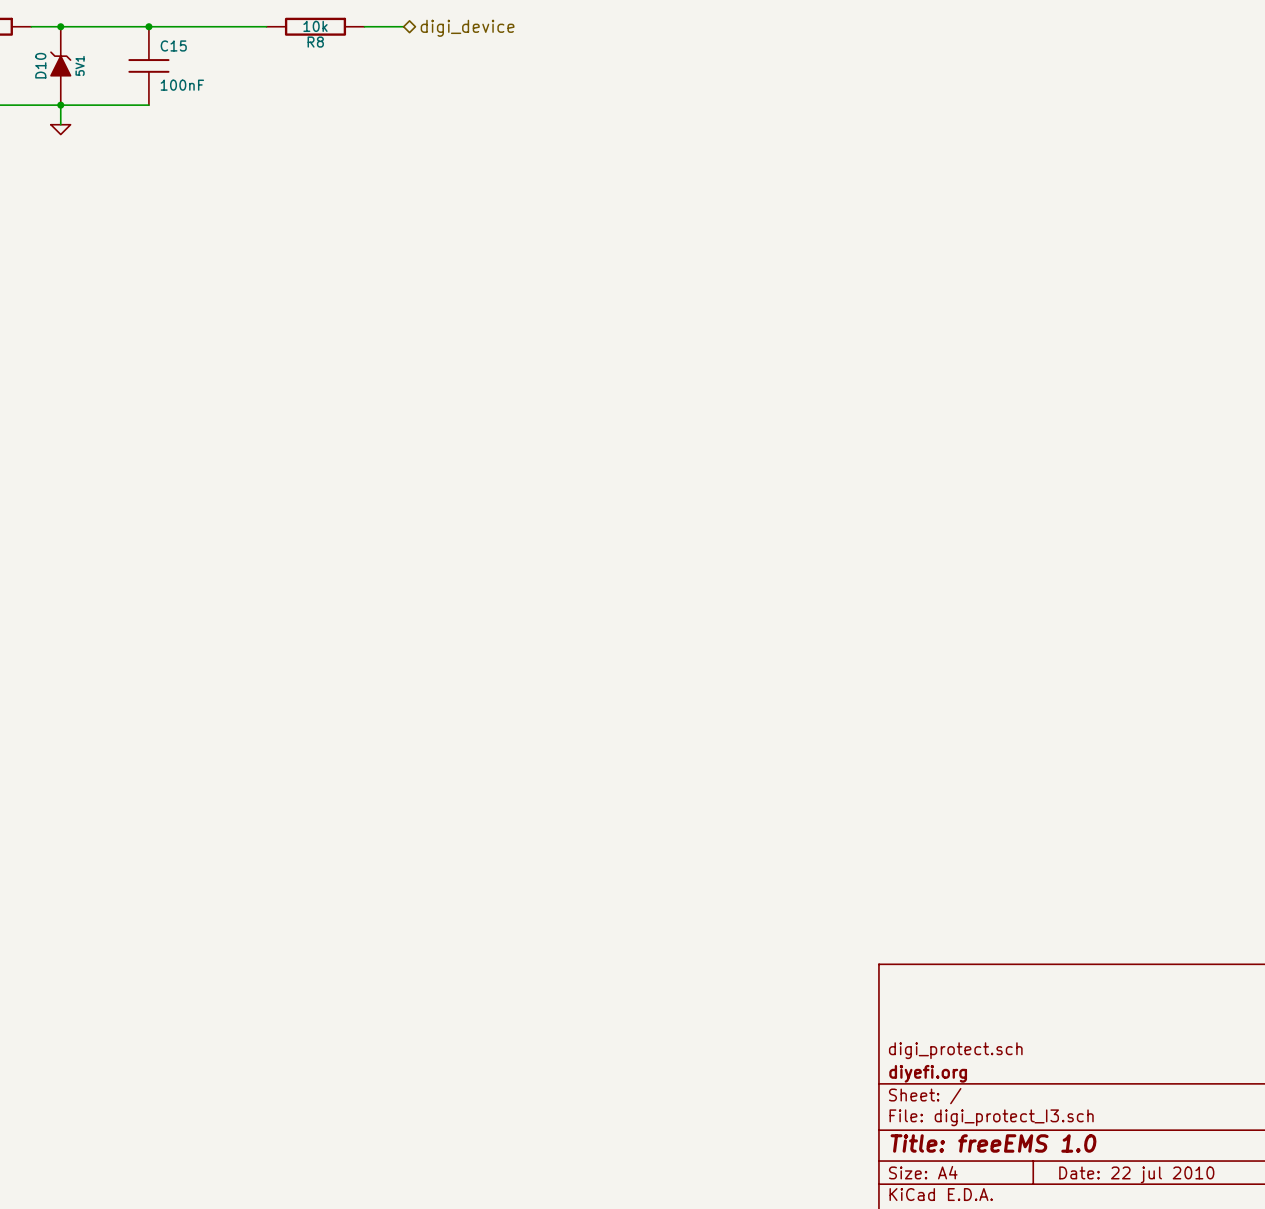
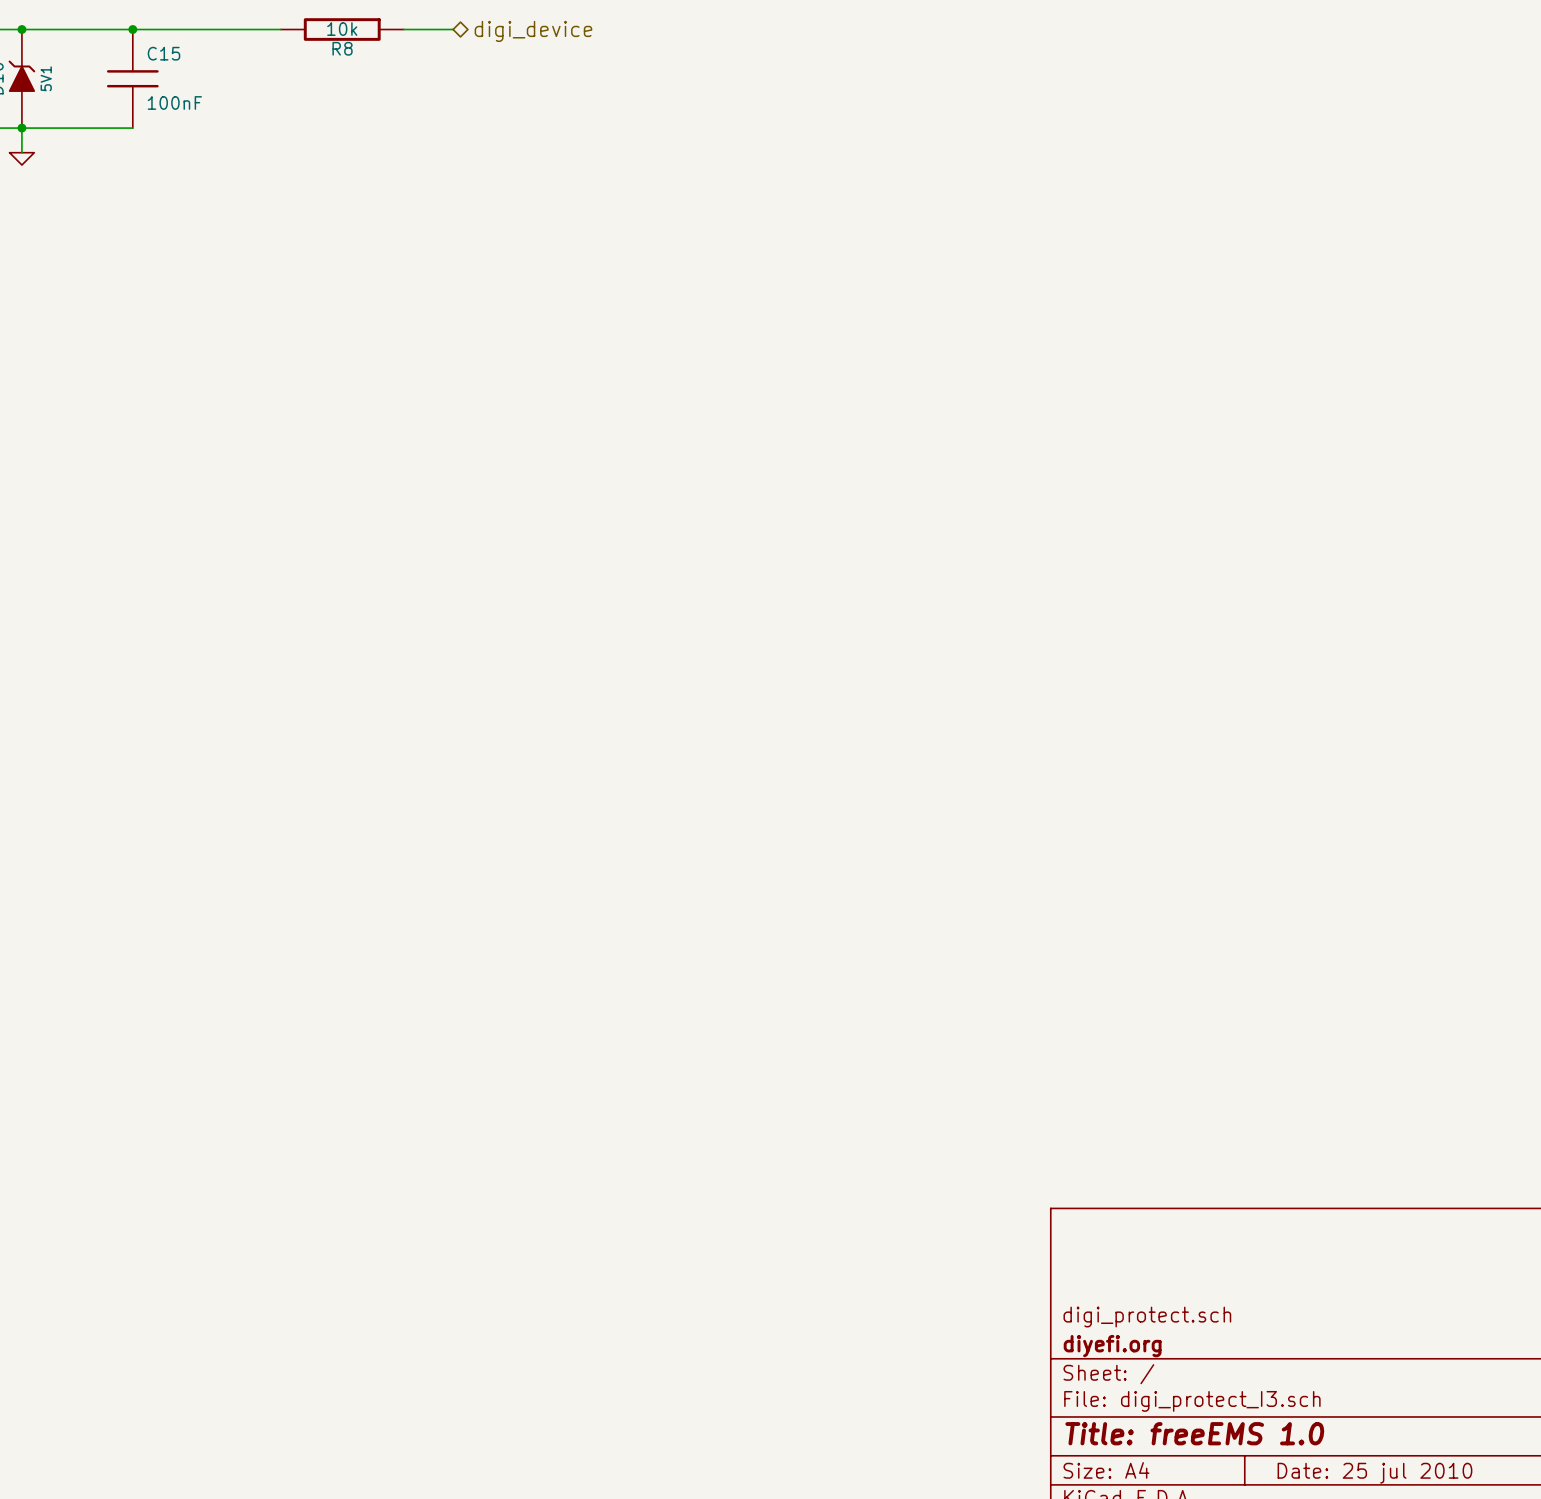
title block: Date: 22 jul 2010 (1136, 1174) -> Date: 25 jul 2010 (1374, 1473)

